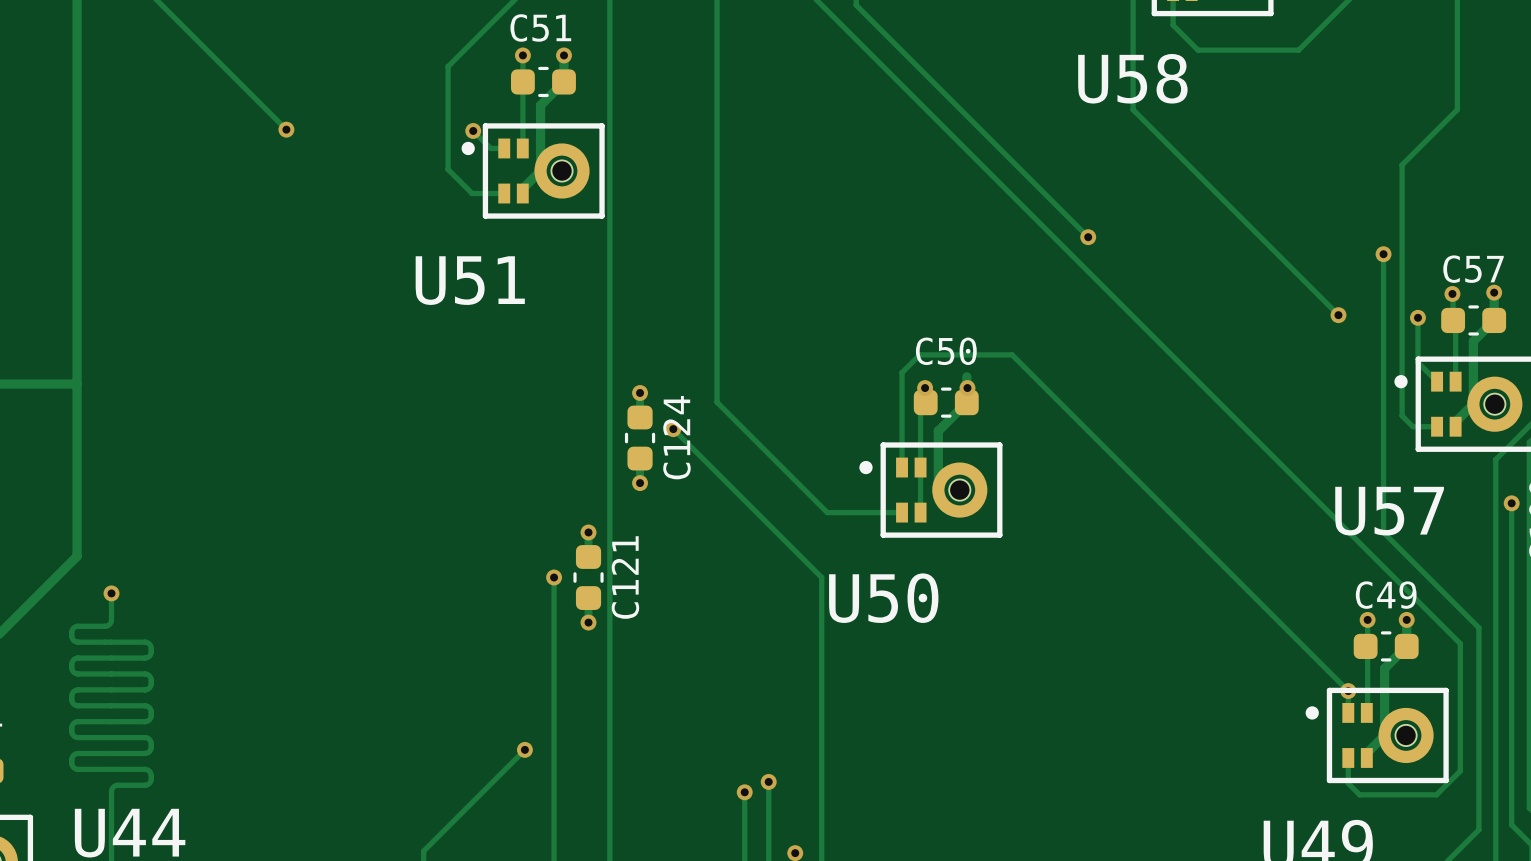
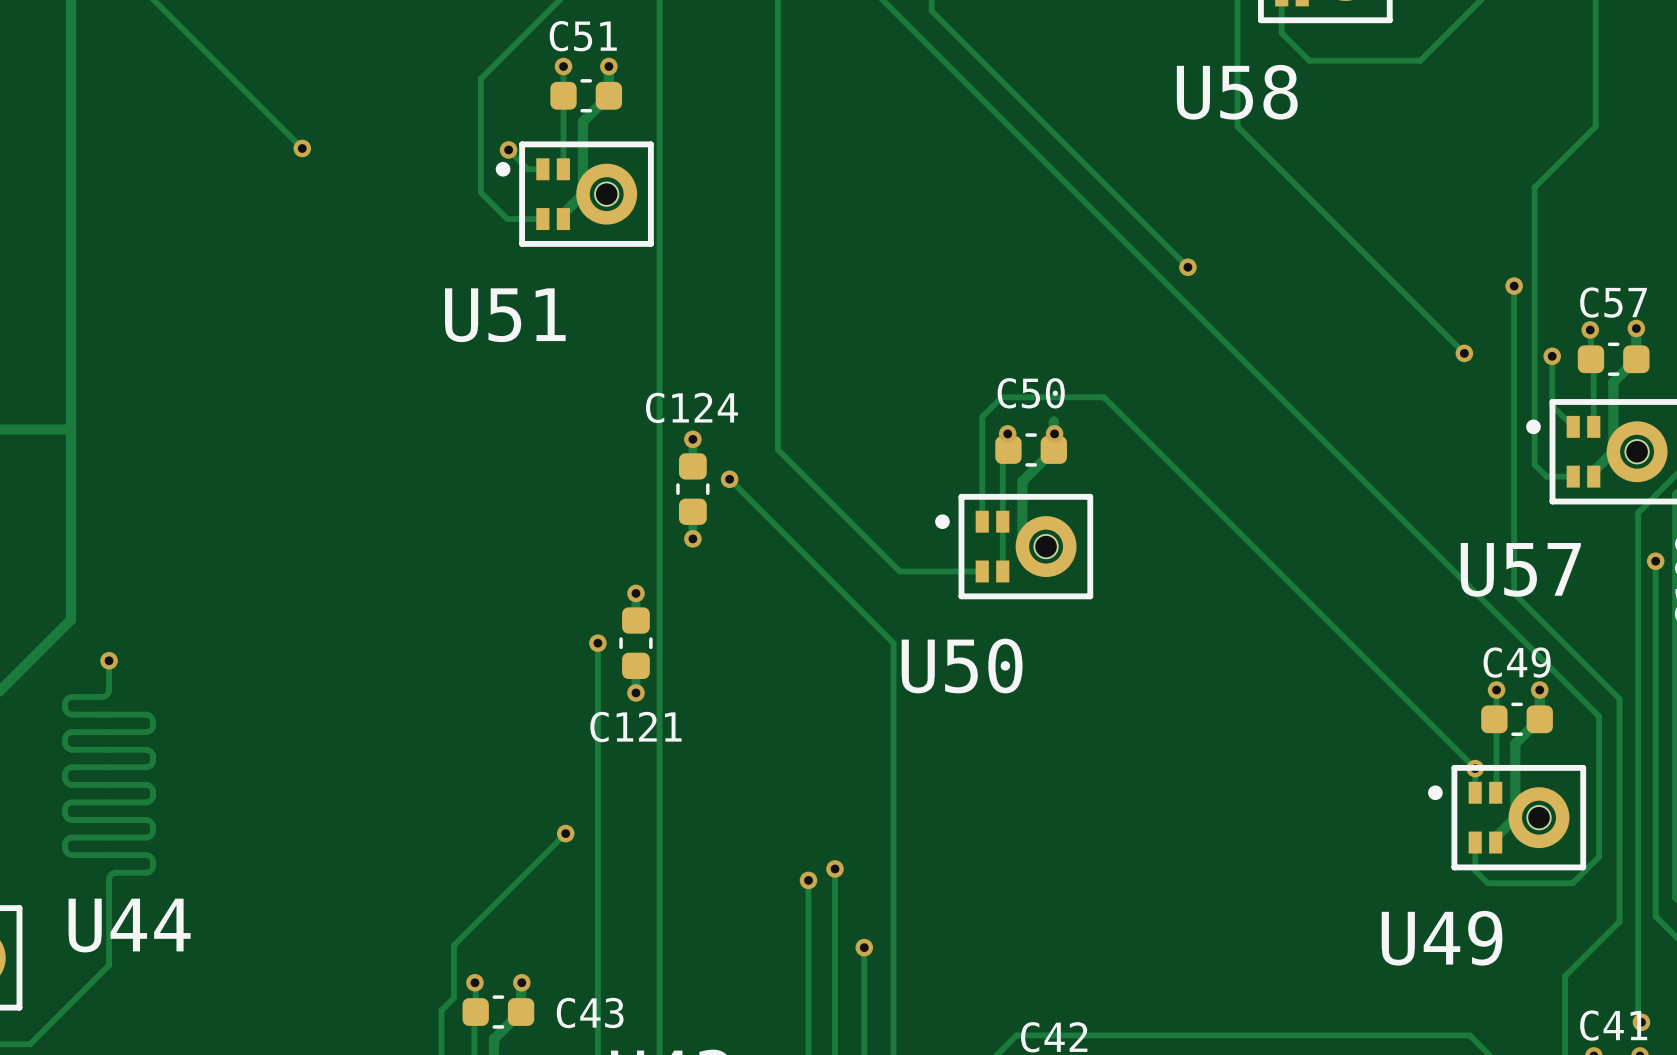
C124 name rotation: 0° (676, 437) -> 90° clockwise (691, 407)
C121 name rotation: 0° (625, 577) -> 90° clockwise (635, 727)

